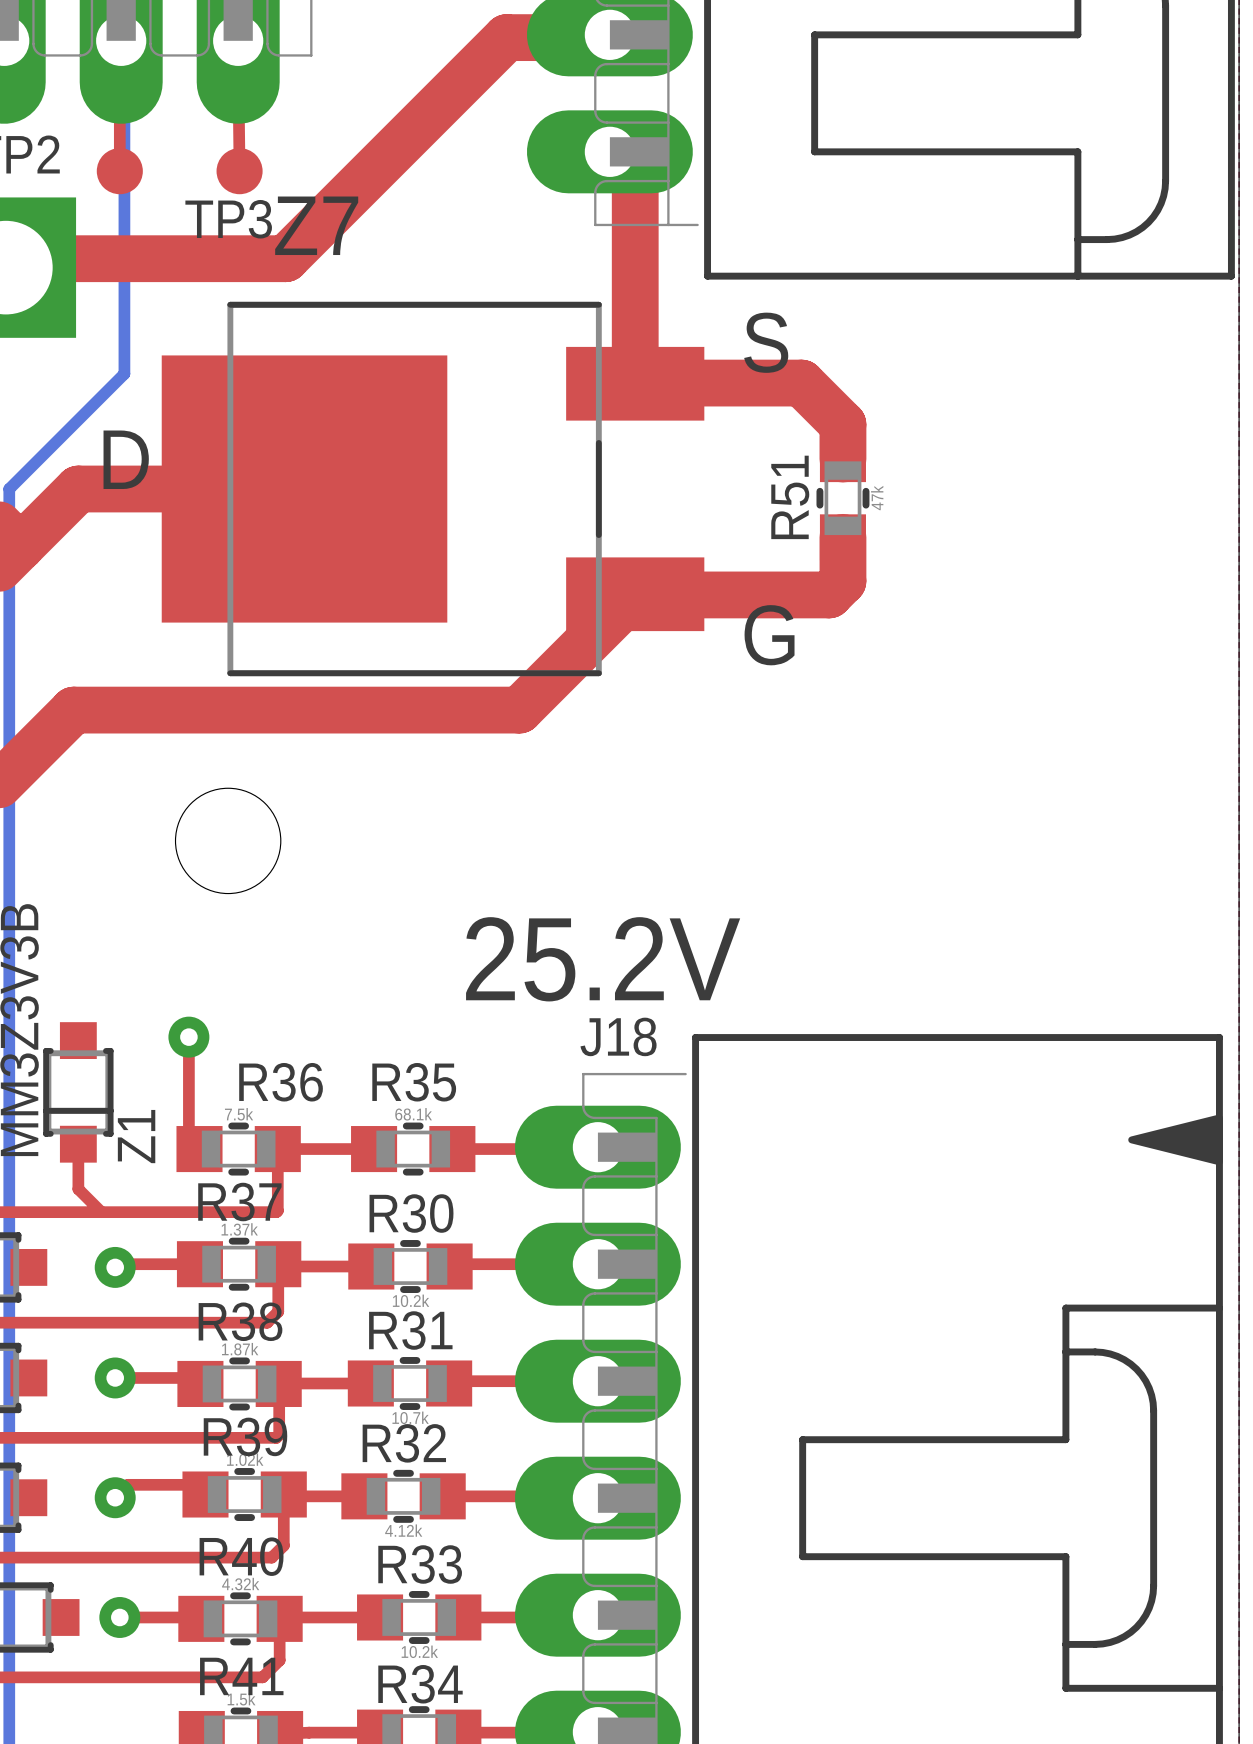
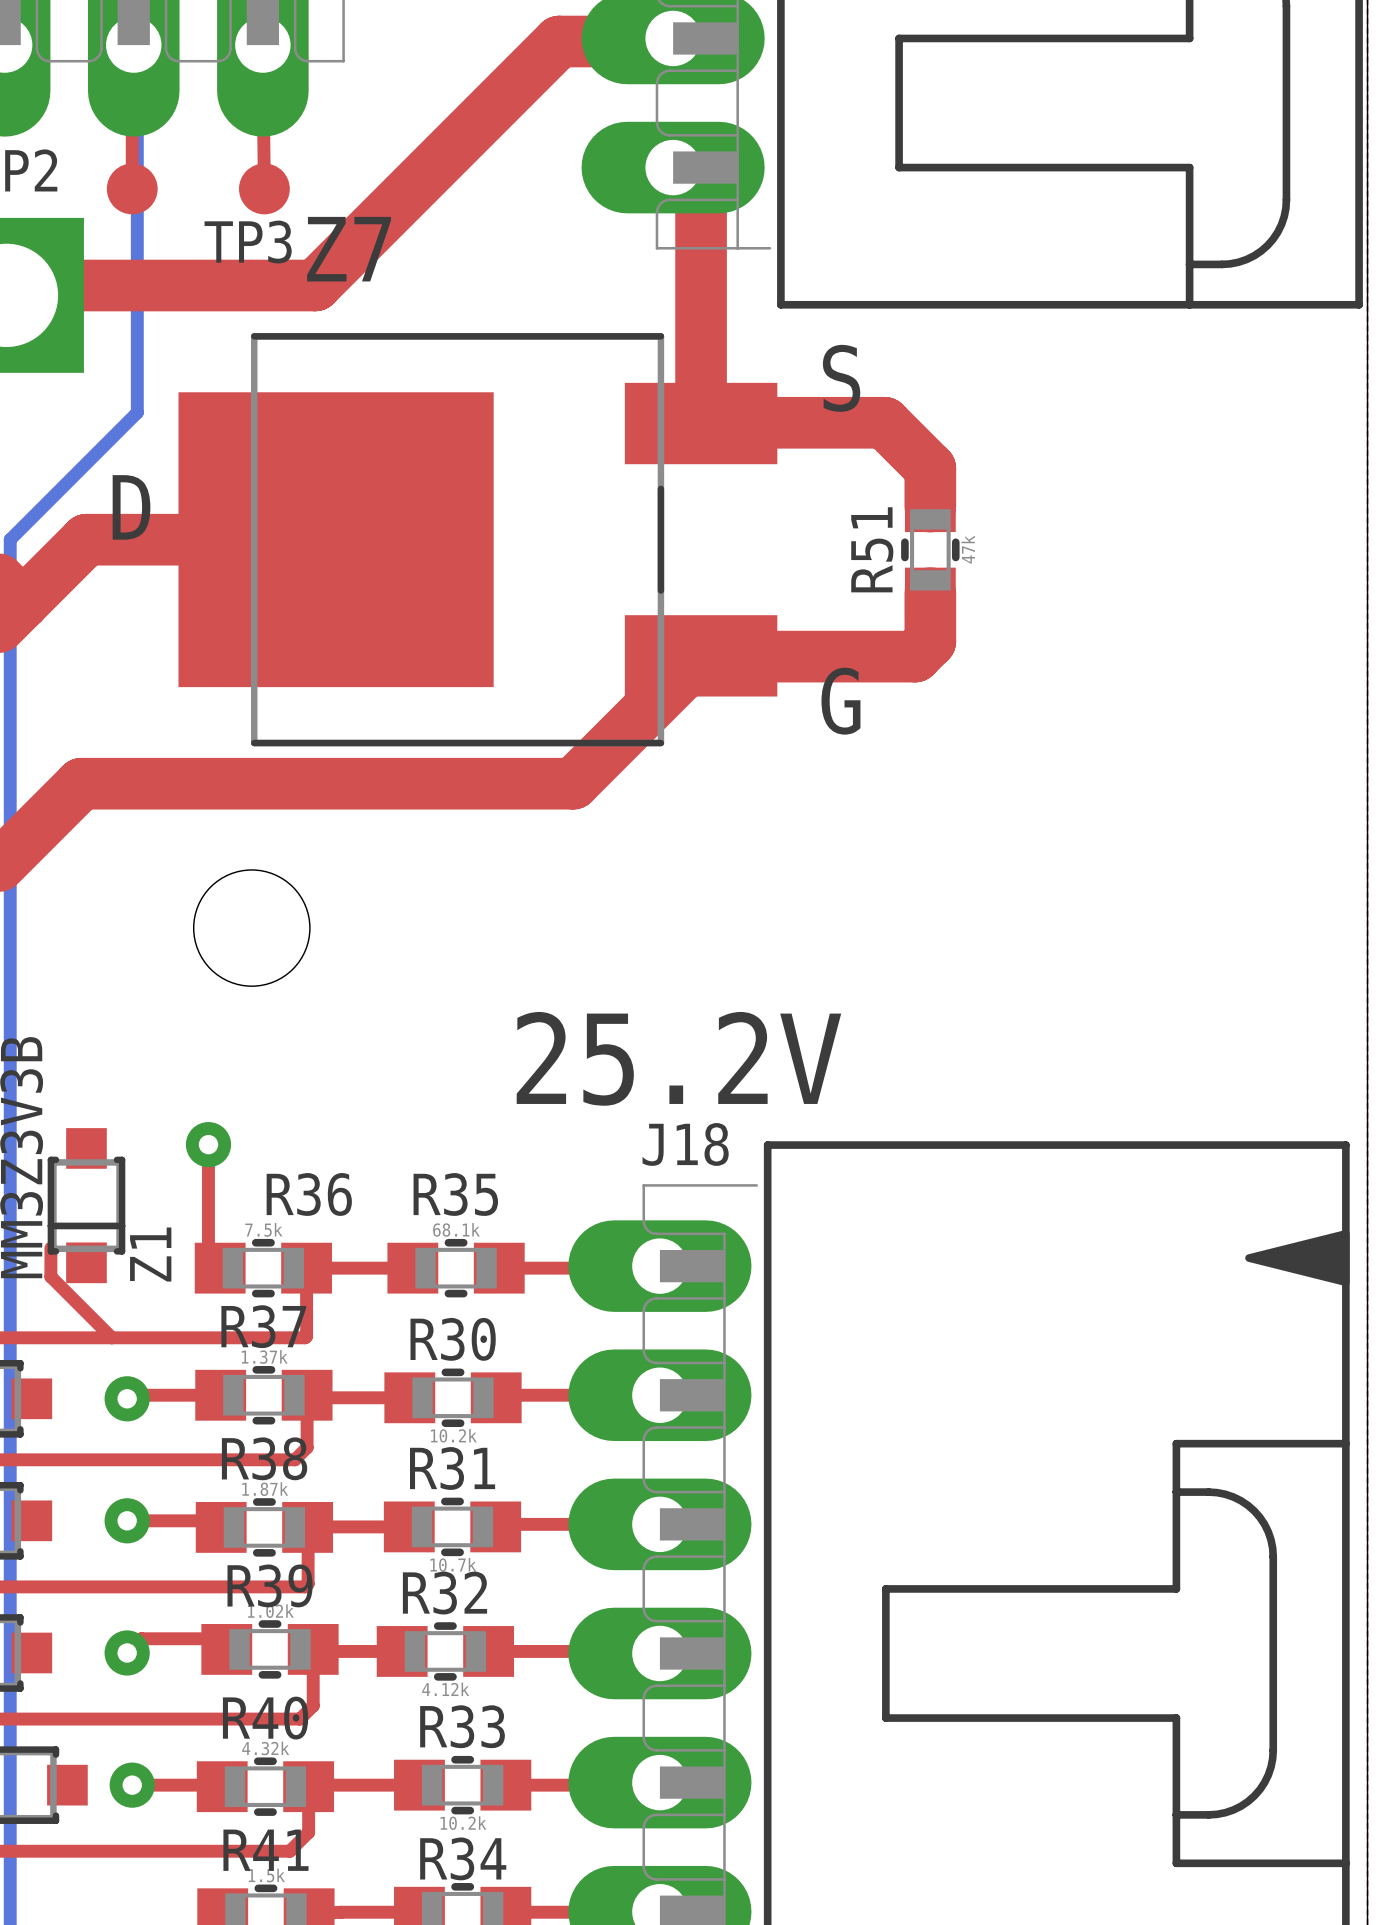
top track: (78, 1144) (78, 1189) -> (50, 1248) (50, 1276) (86, 1312)

